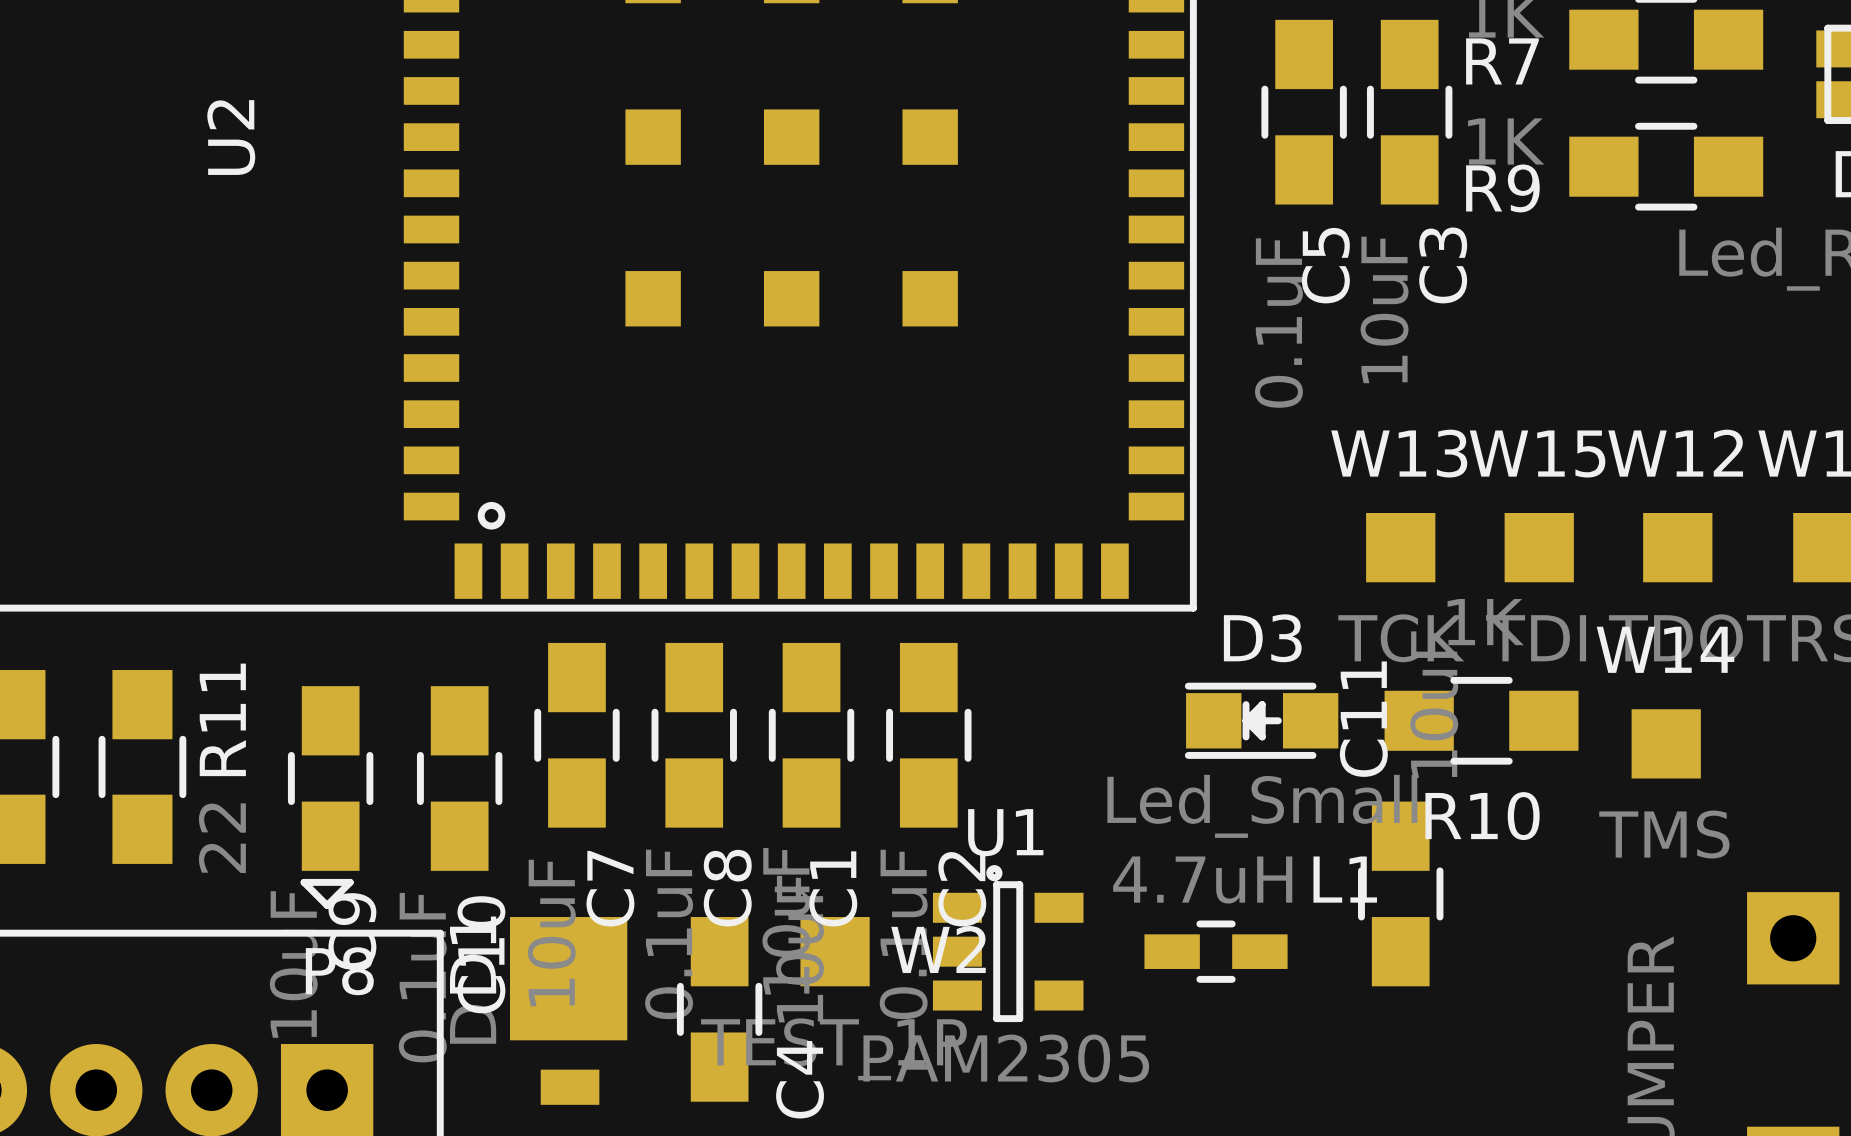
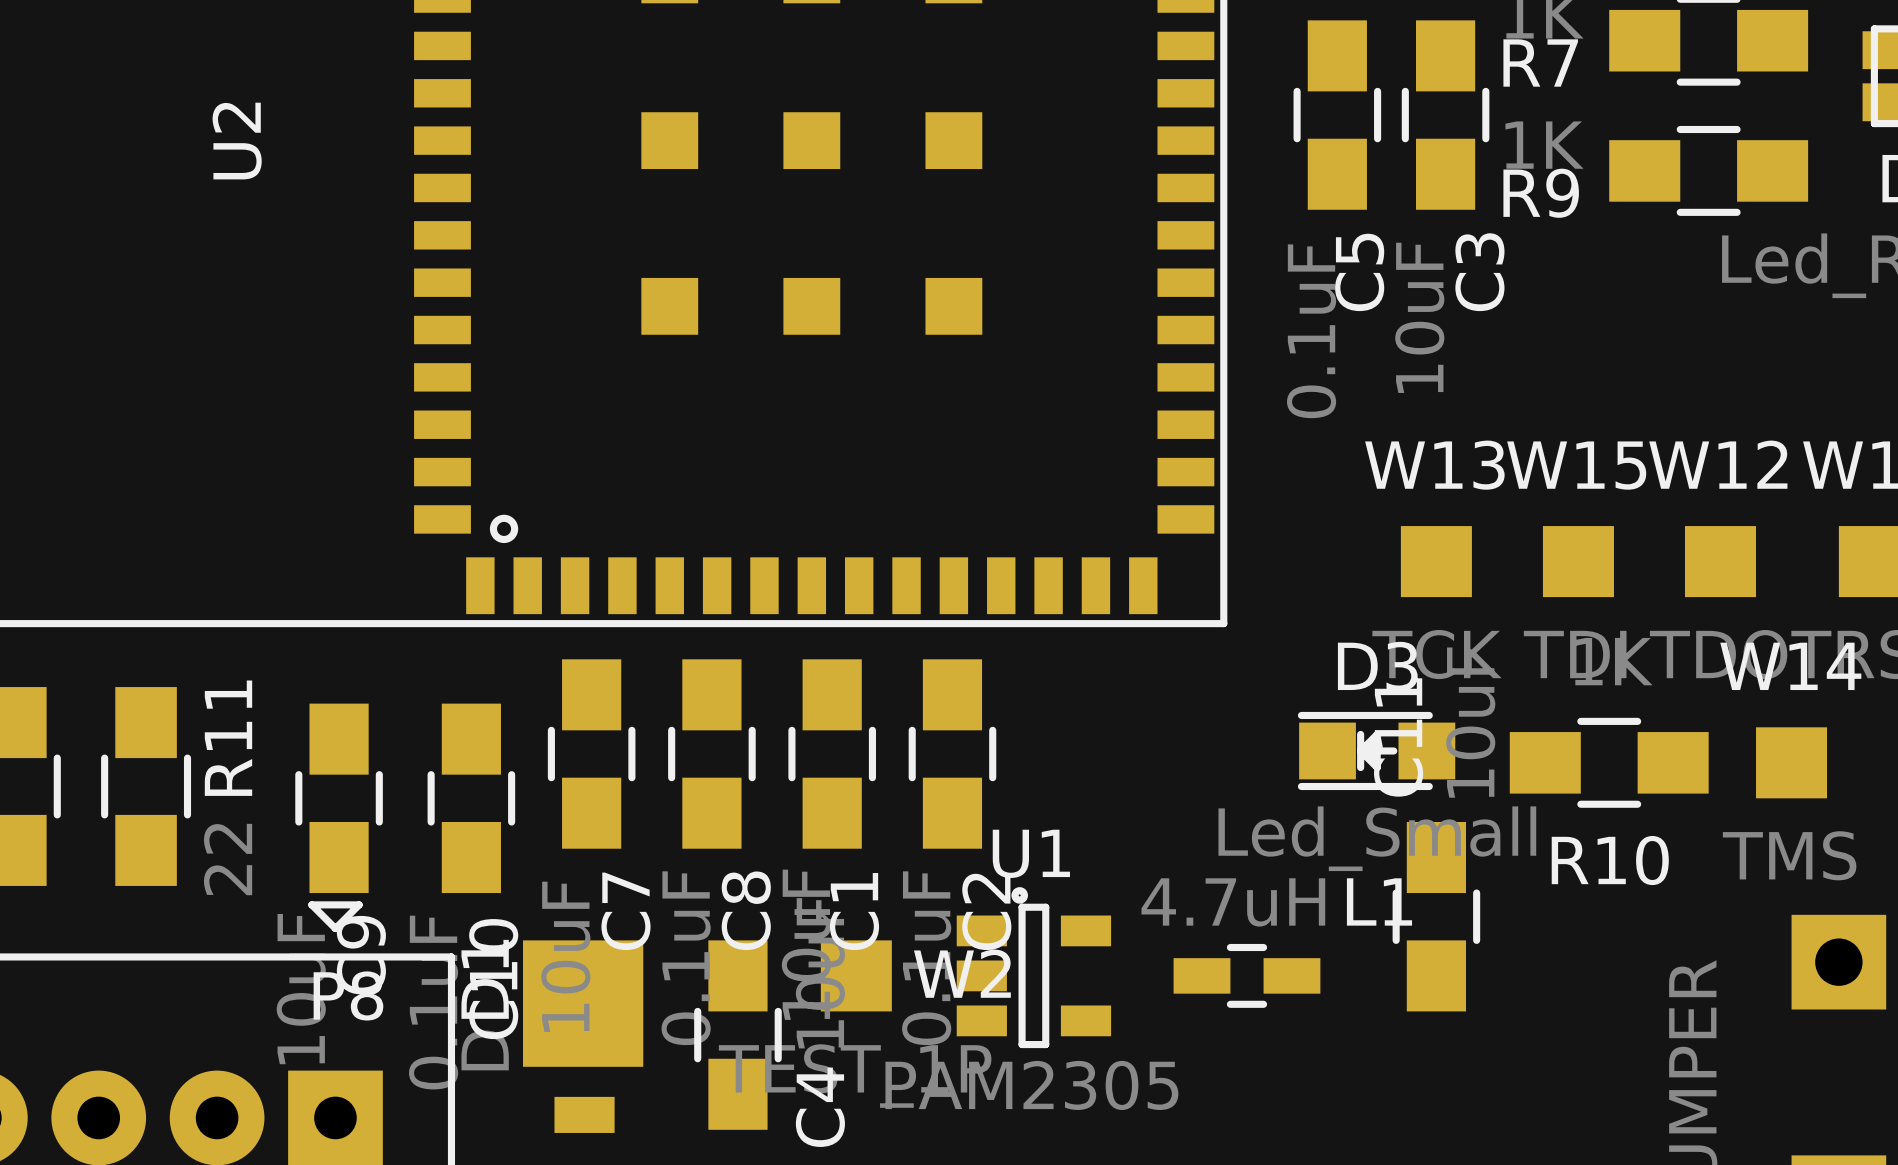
D3 position: (1261, 720) -> (1376, 750)
R10 position: (1481, 720) -> (1609, 762)
W14 position: (1666, 743) -> (1791, 762)

